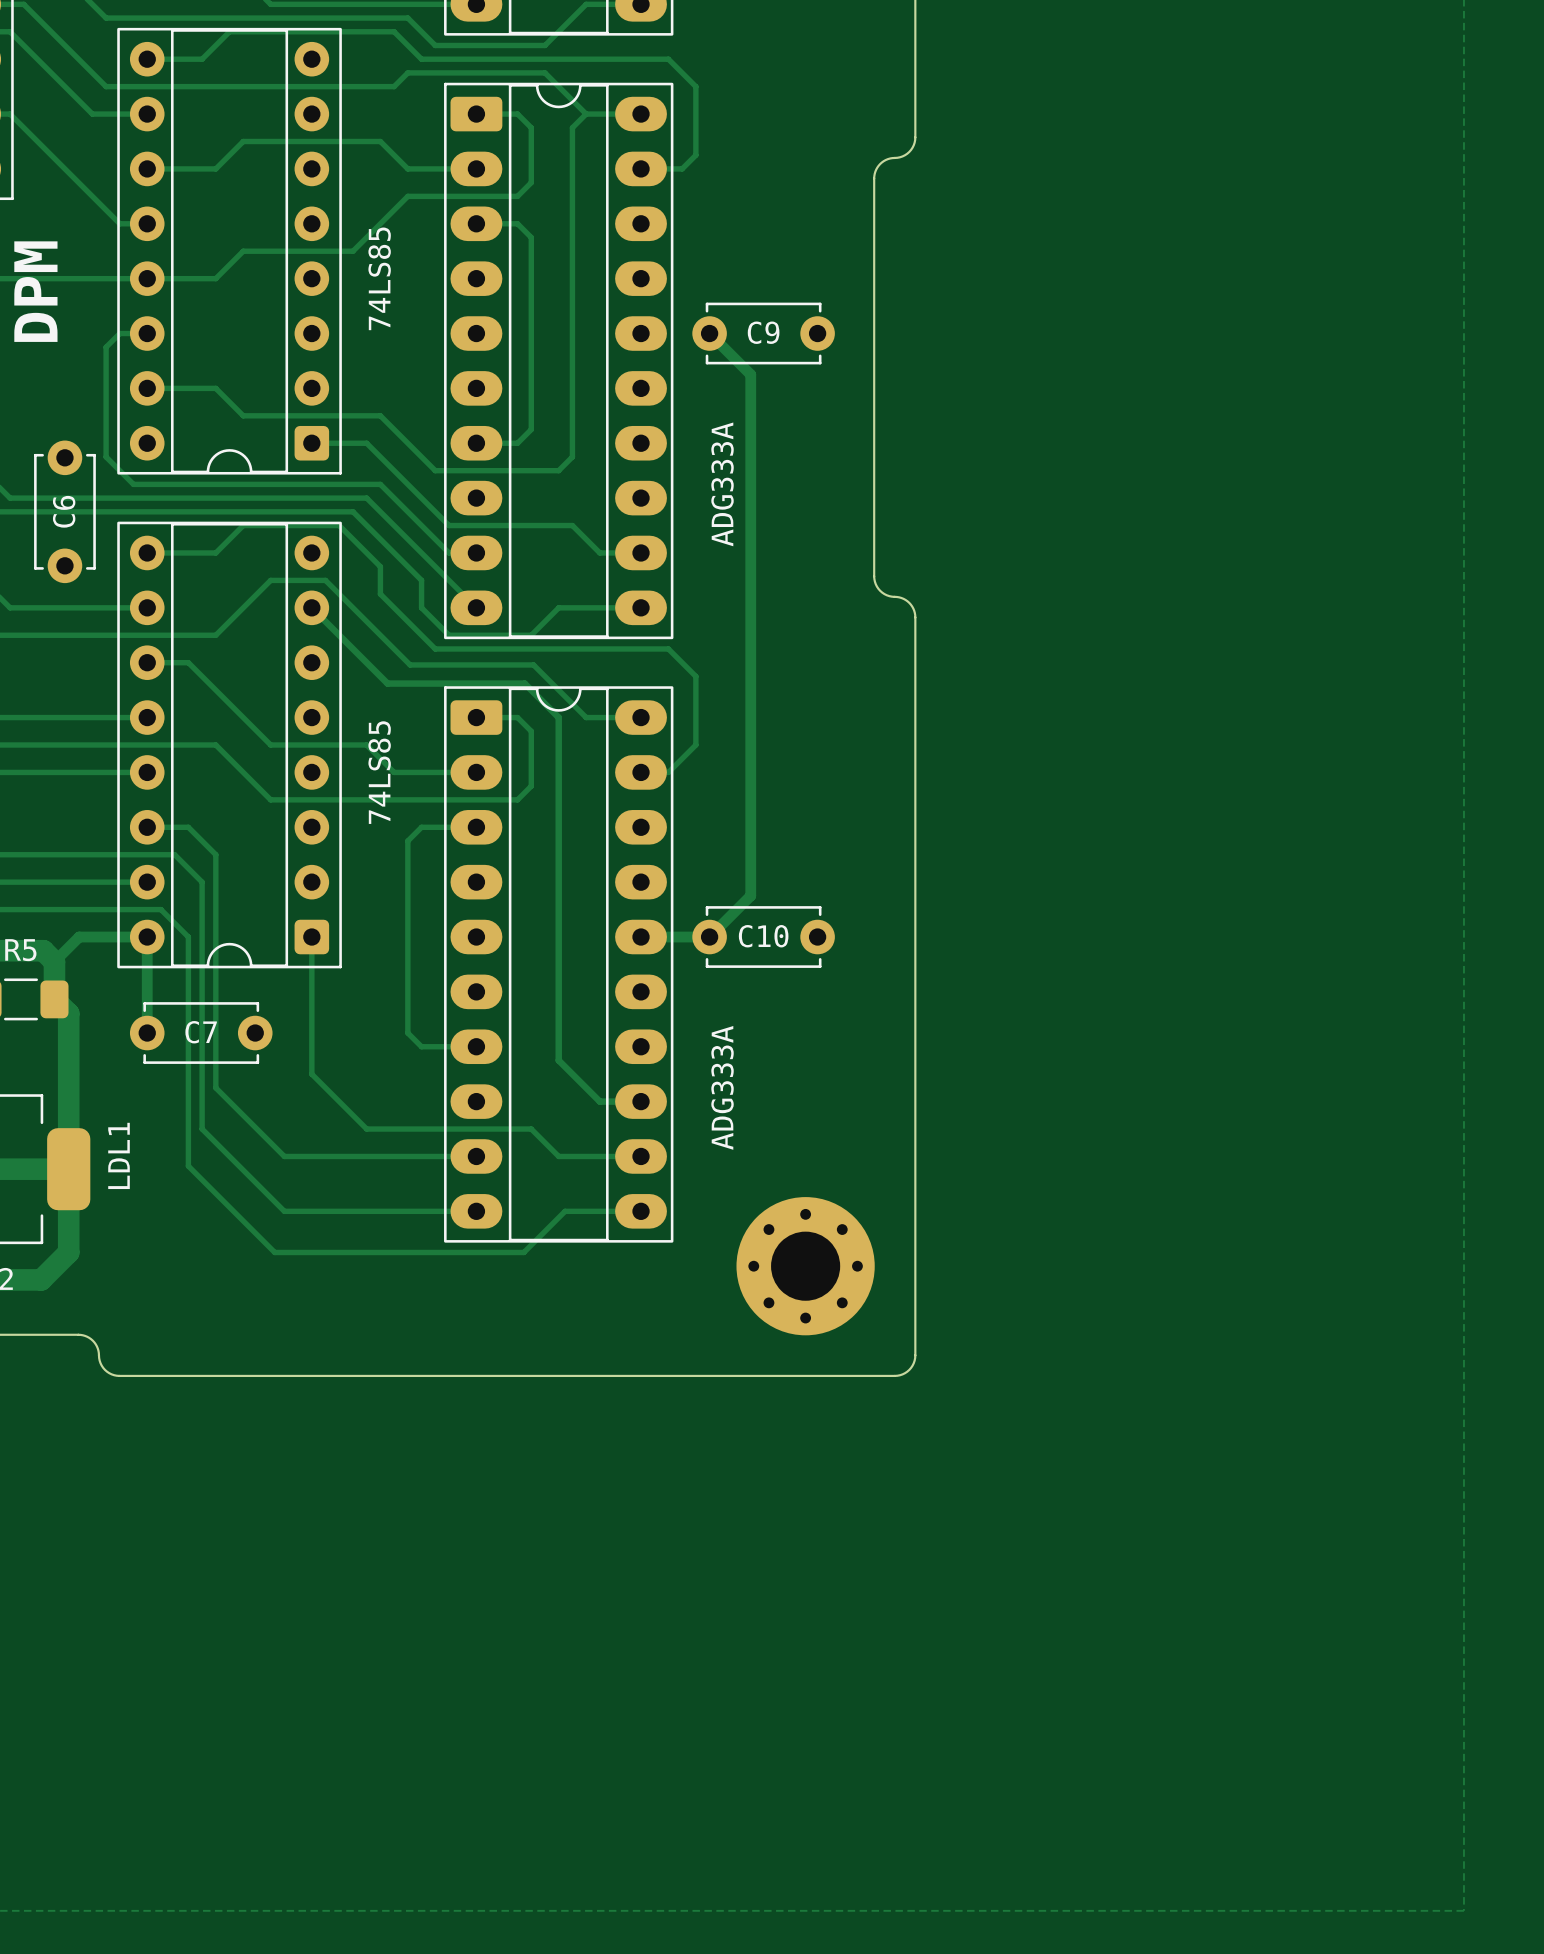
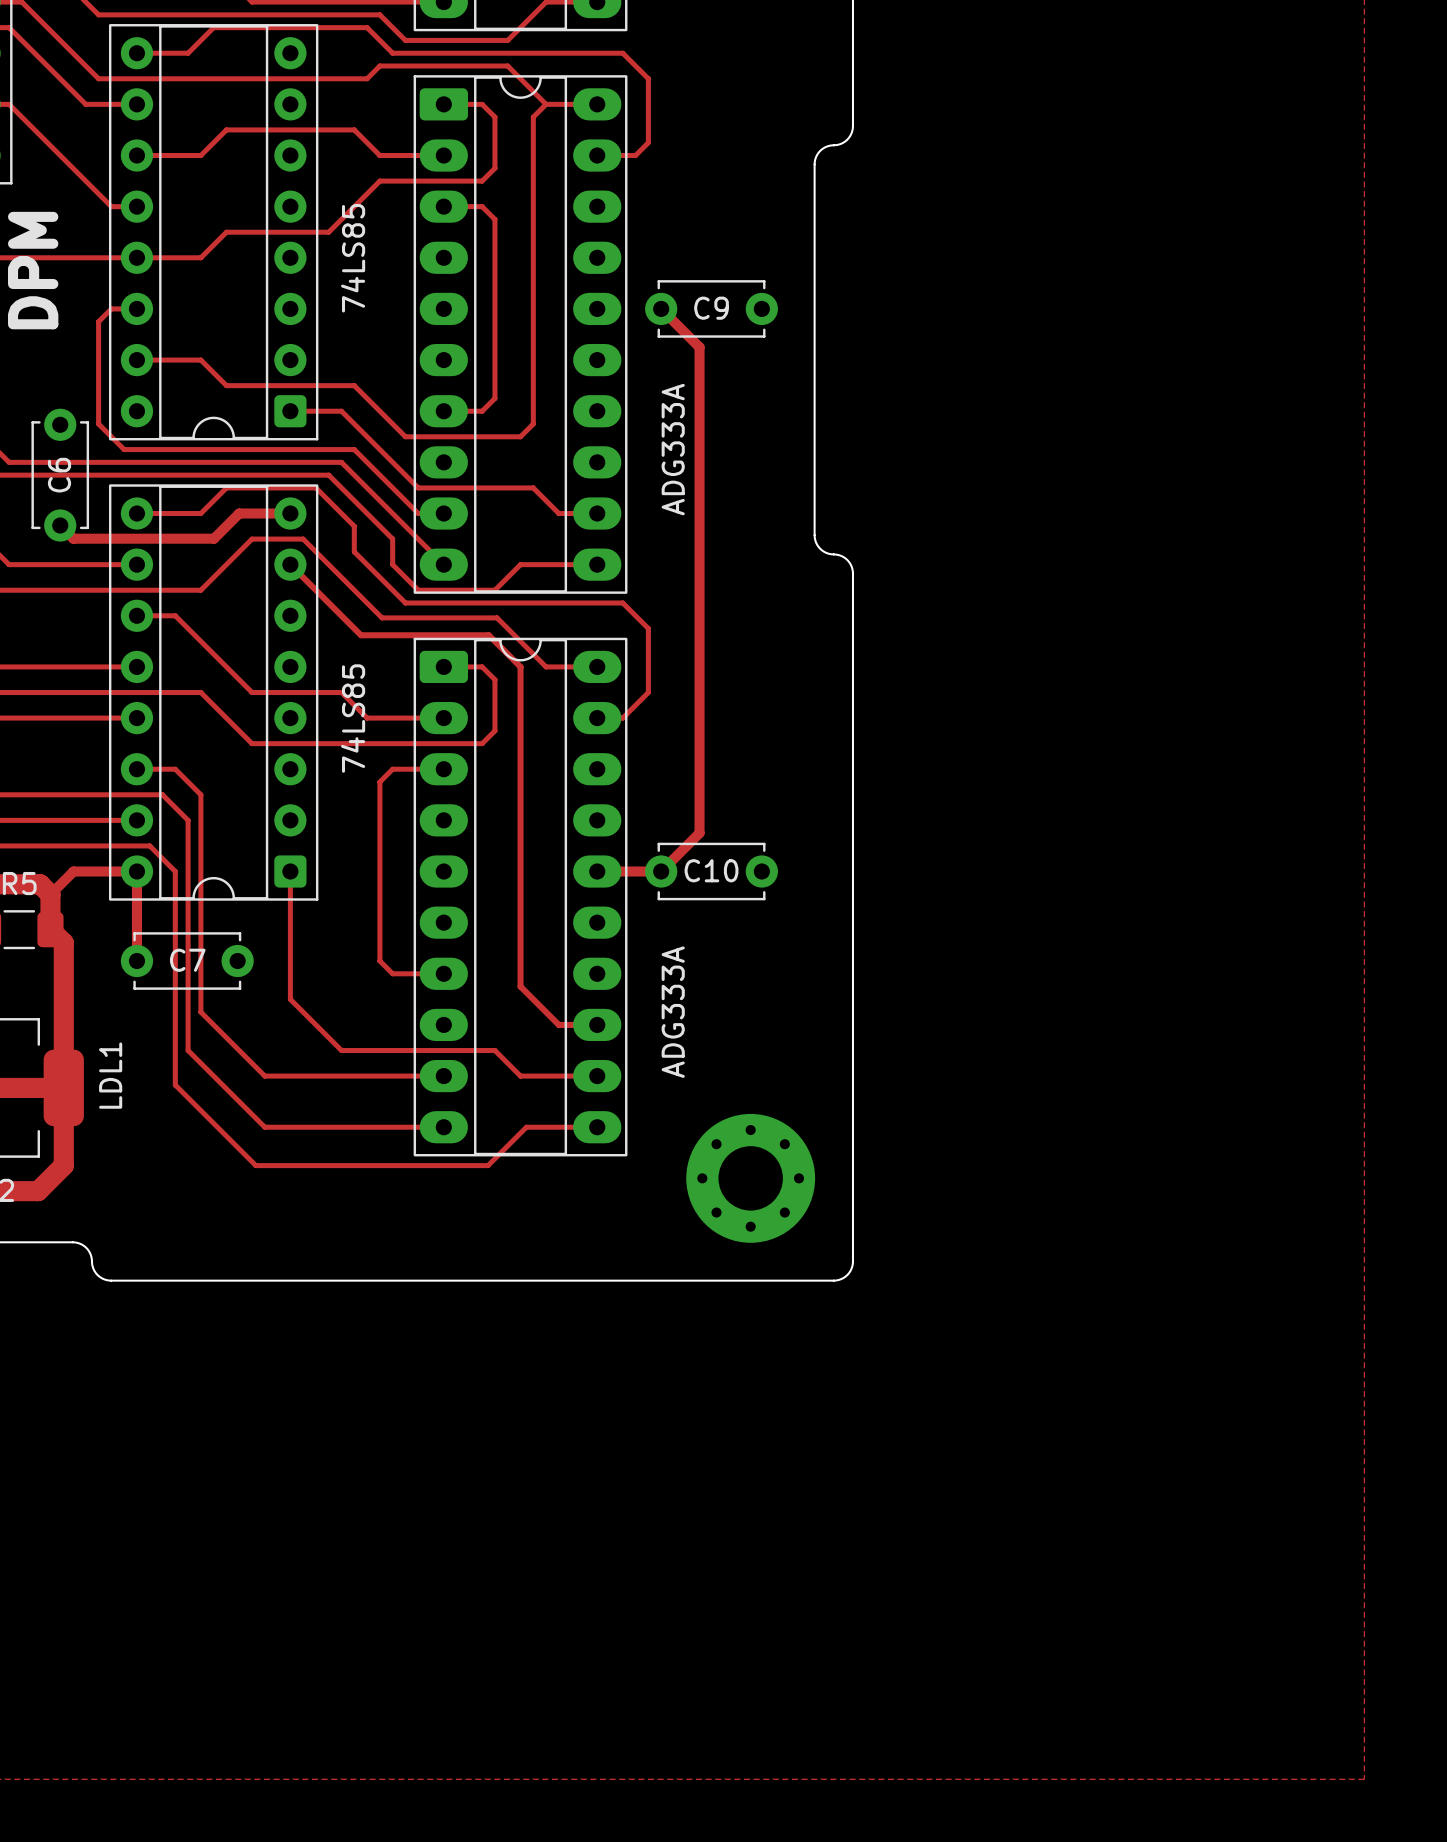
track: none -> (290, 513) (239, 513) (214, 538) (73, 538) (60, 525)

